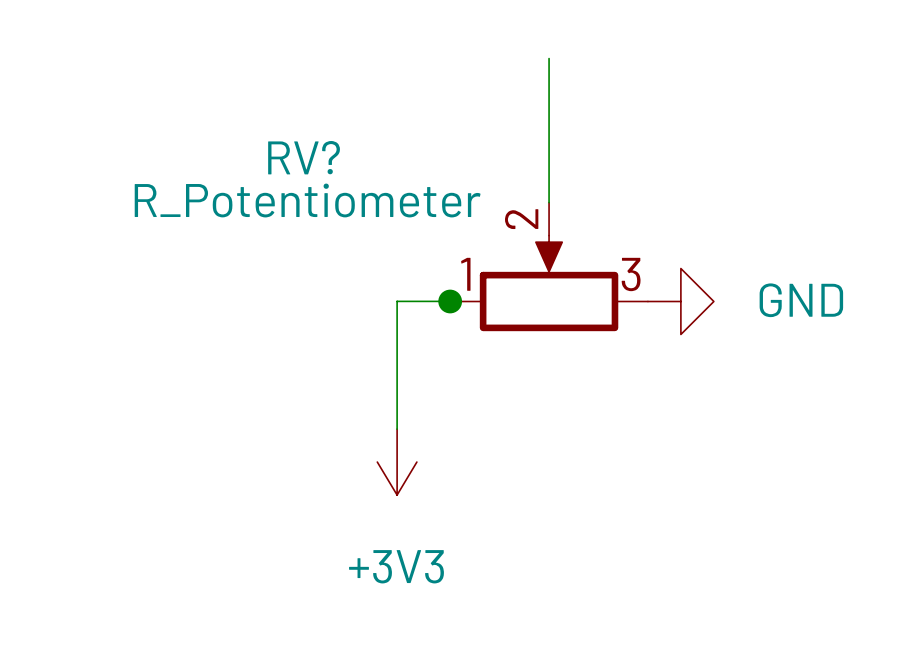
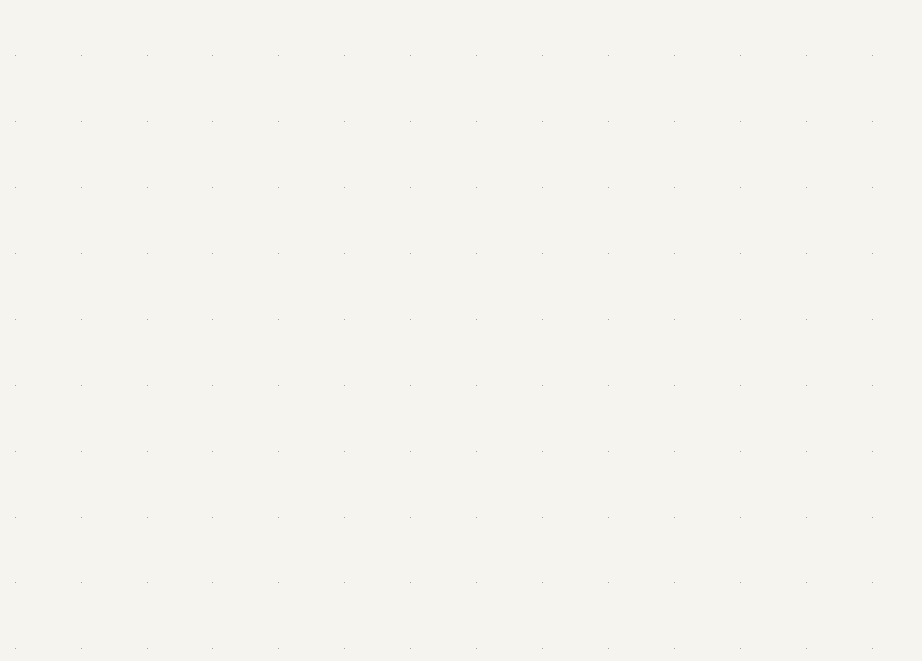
wire: (549, 58) (549, 202) -> none
RV?: R_Potentiometer (549, 266) -> none
wire: (450, 301) (397, 301) (397, 429) -> none
junction: (450, 301) -> none
power symbol: GND (680, 301) -> none
power symbol: +3V3 (397, 462) -> none

